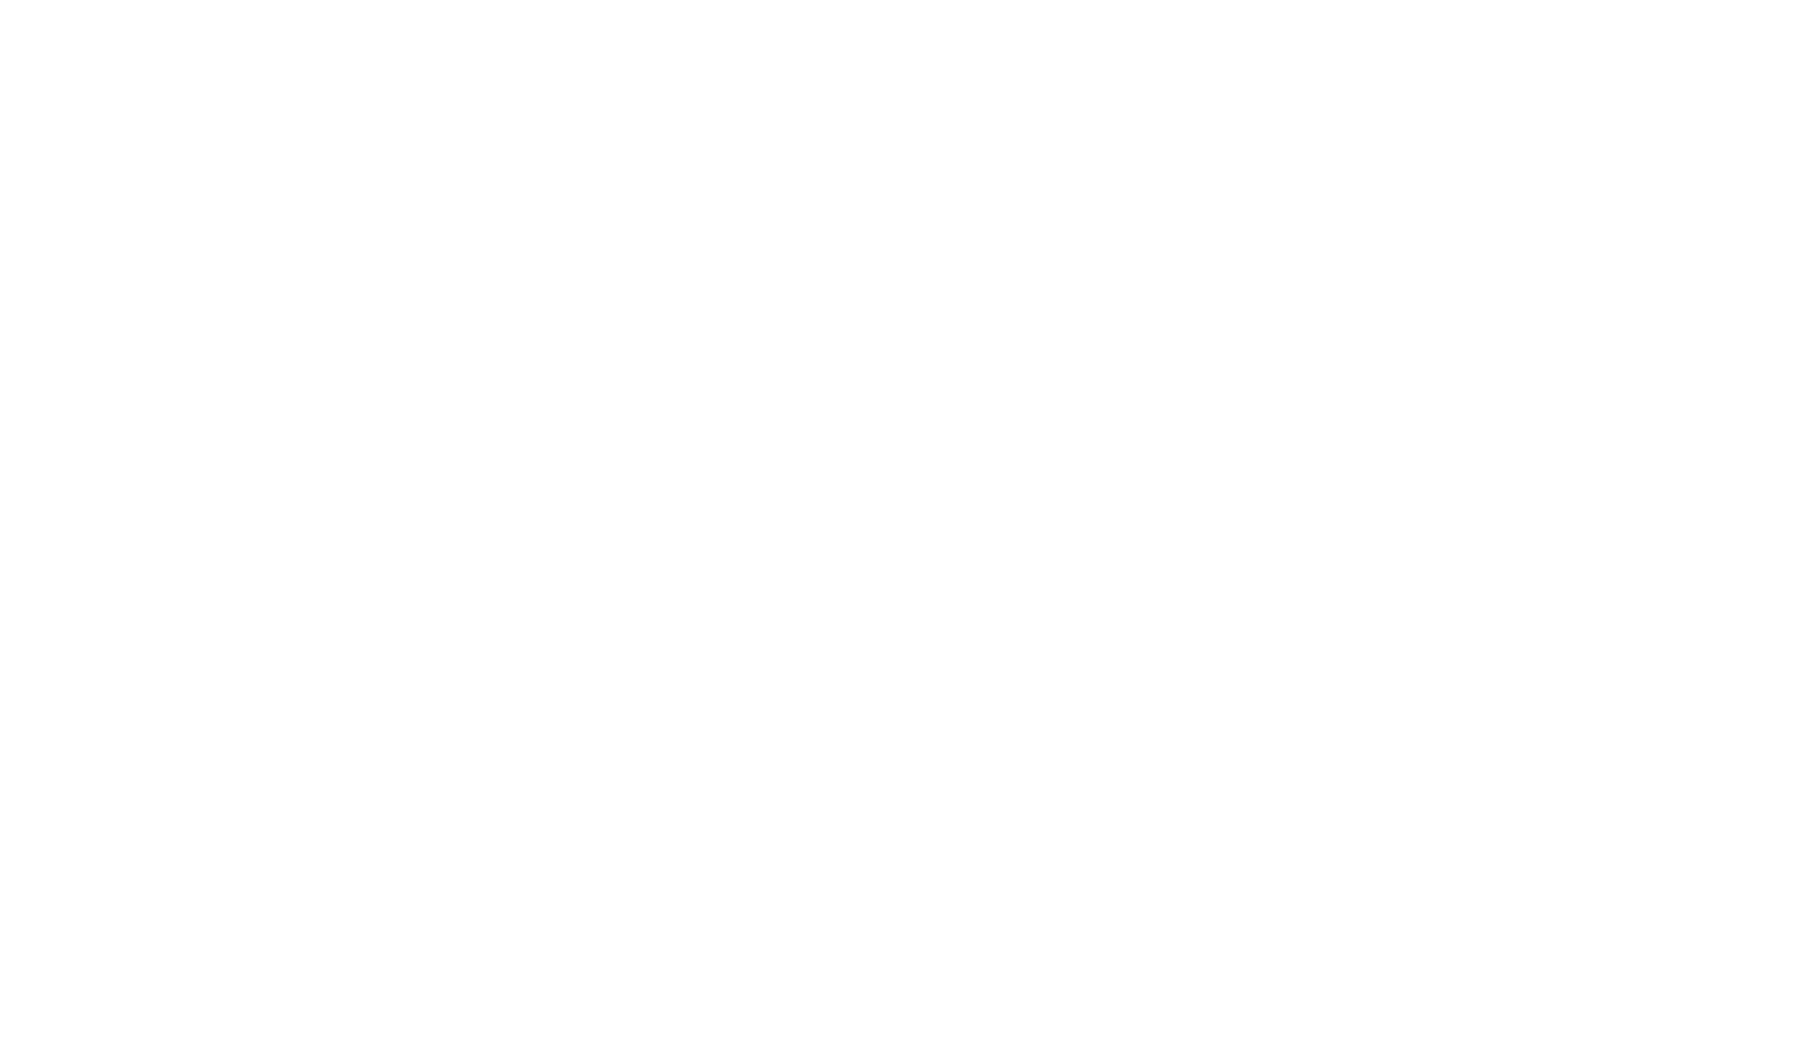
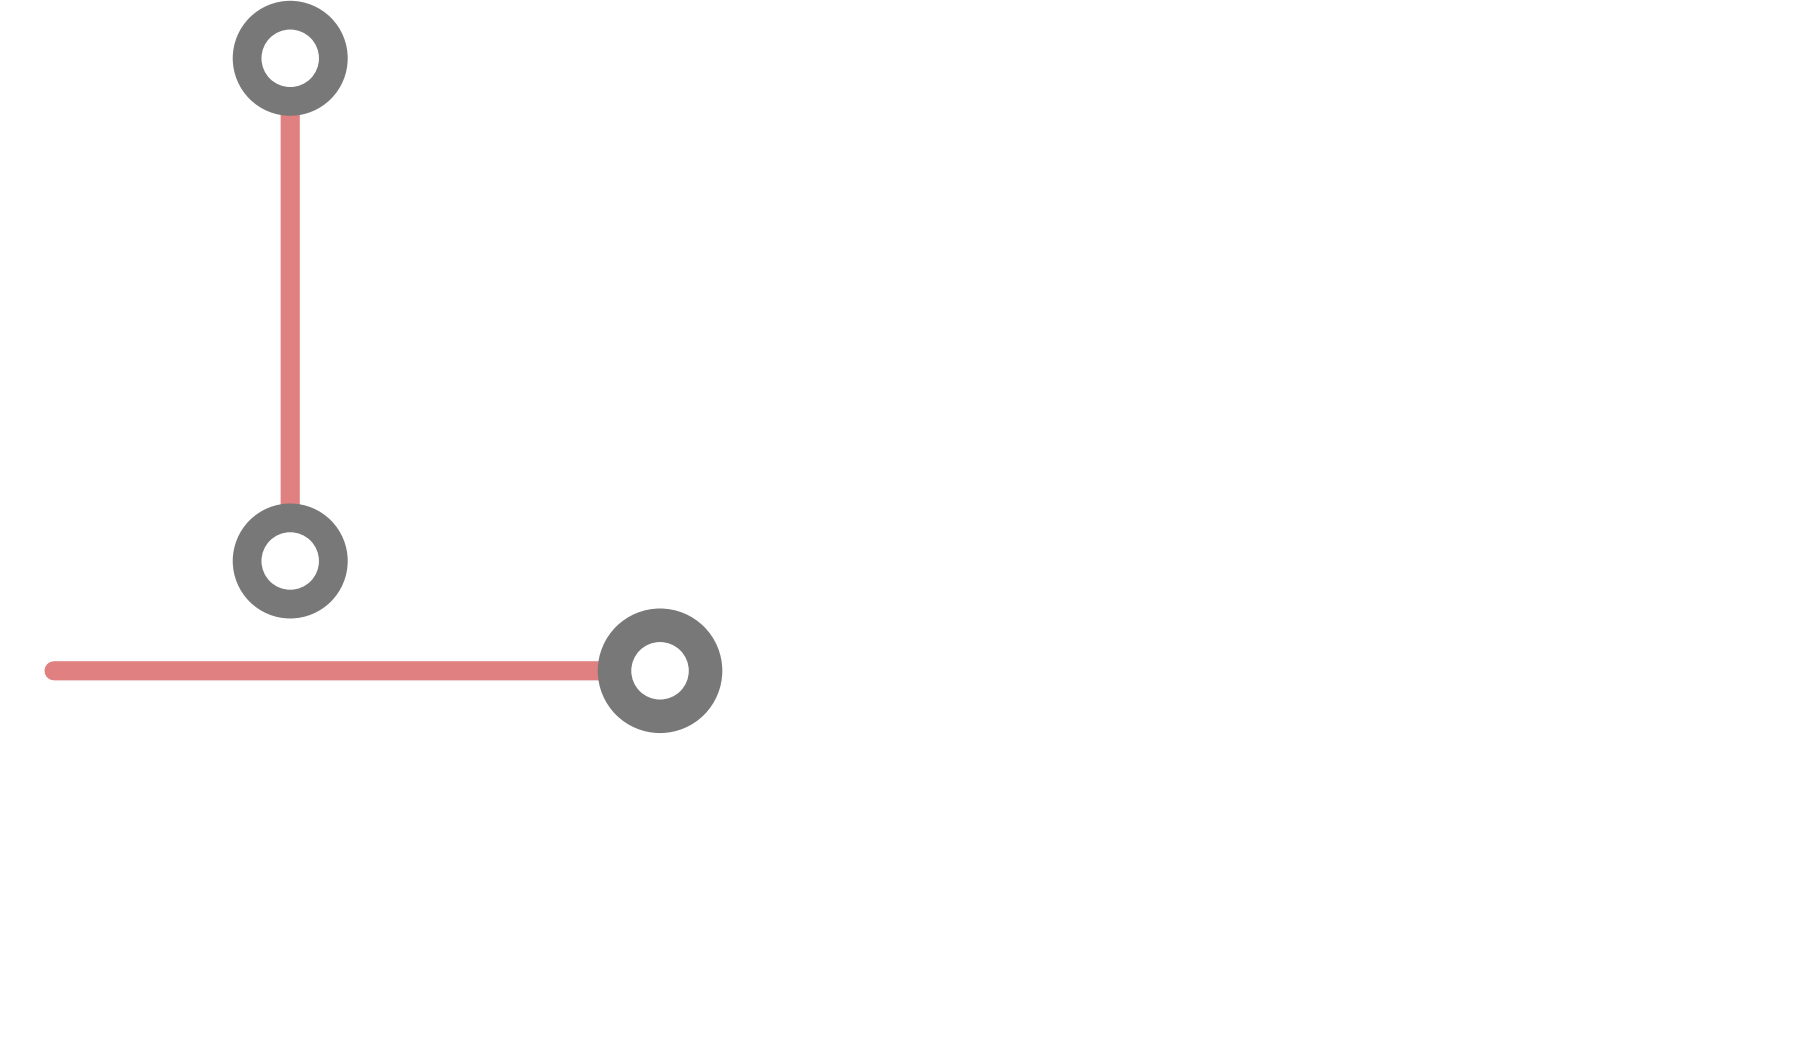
track: none -> (290, 58) (290, 560)
via: none -> (290, 58)
via: none -> (290, 560)
track: none -> (54, 670) (660, 670)
via: none -> (660, 670)

